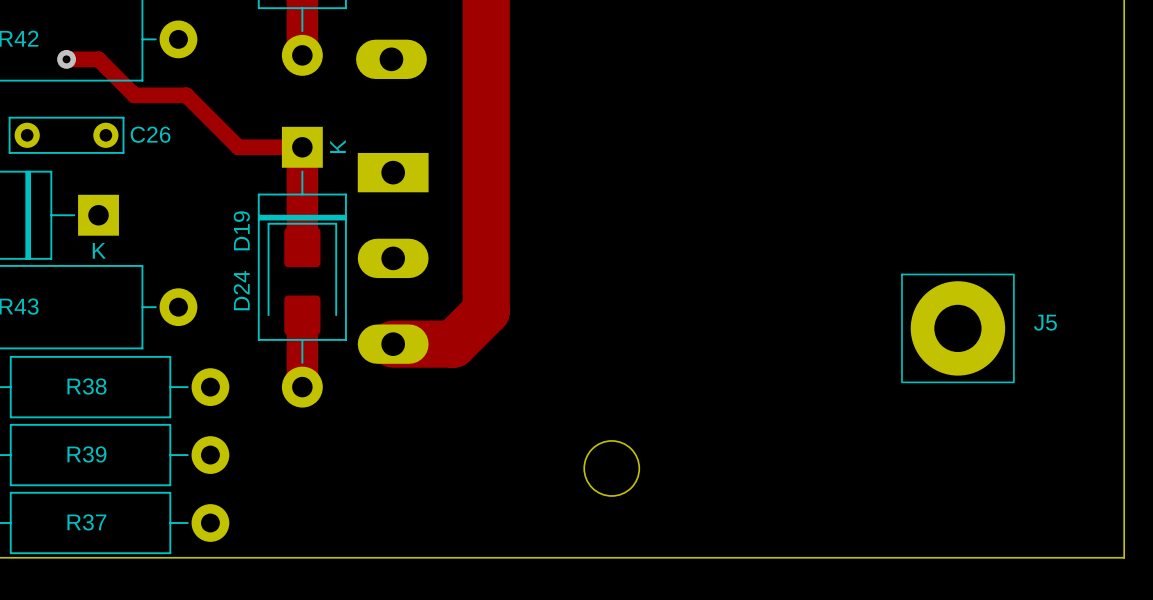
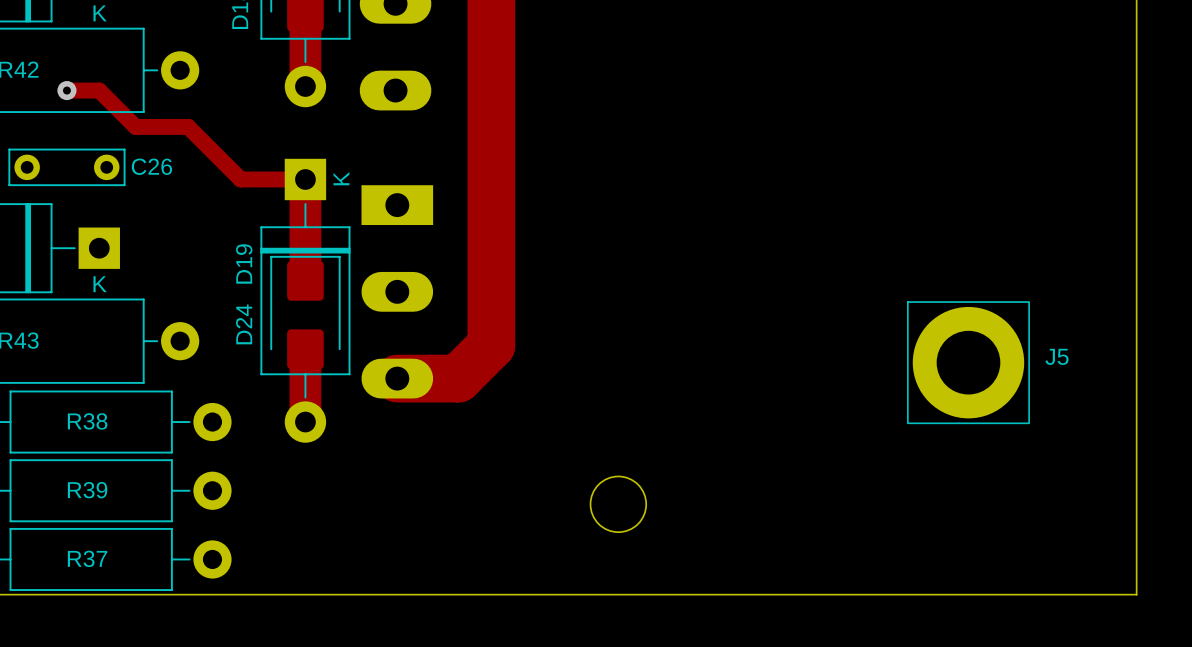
J5 footprint: [901, 273, 1015, 384] -> [907, 301, 1030, 425]

